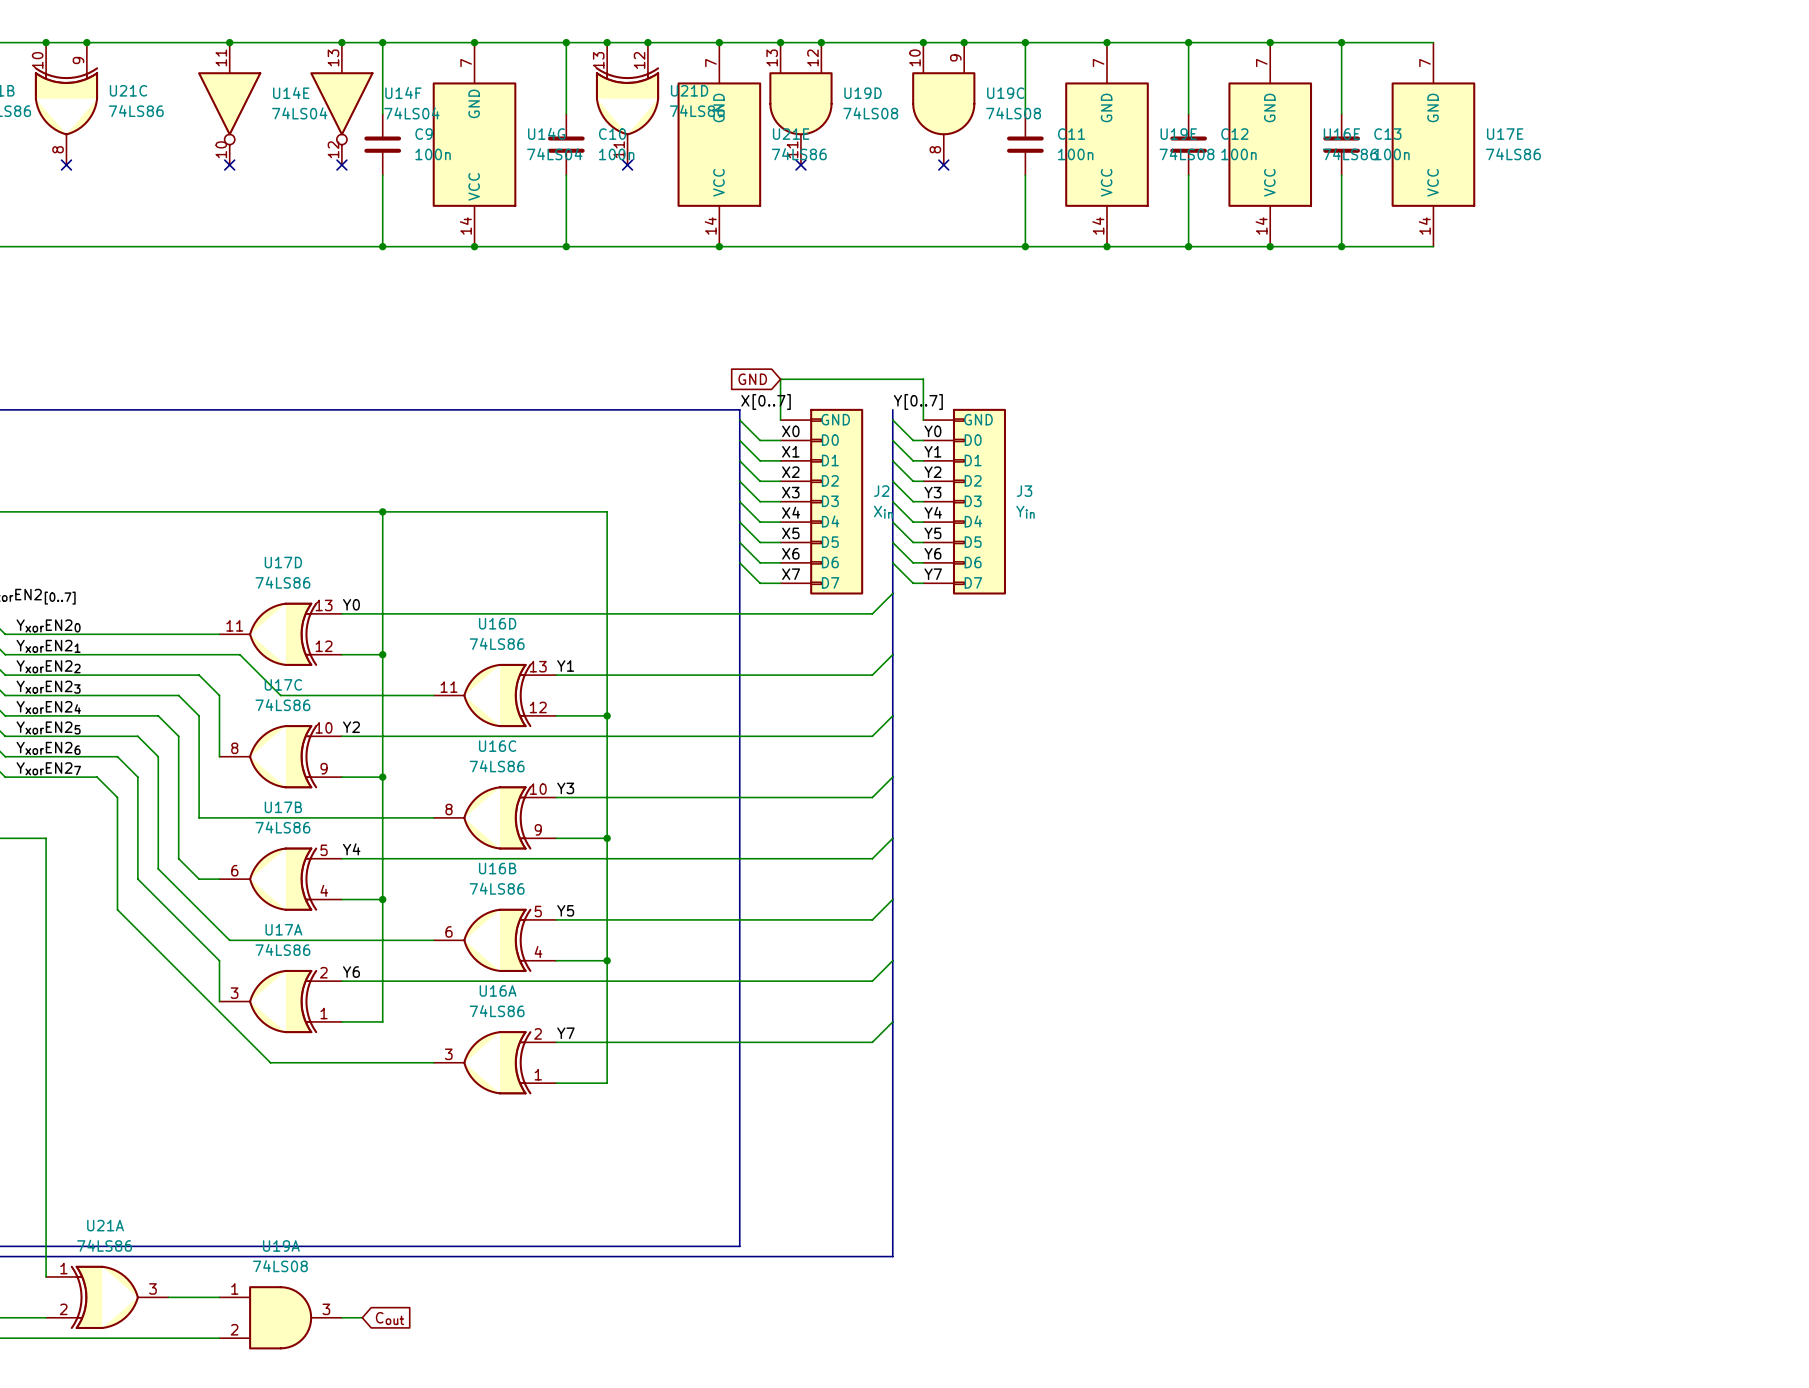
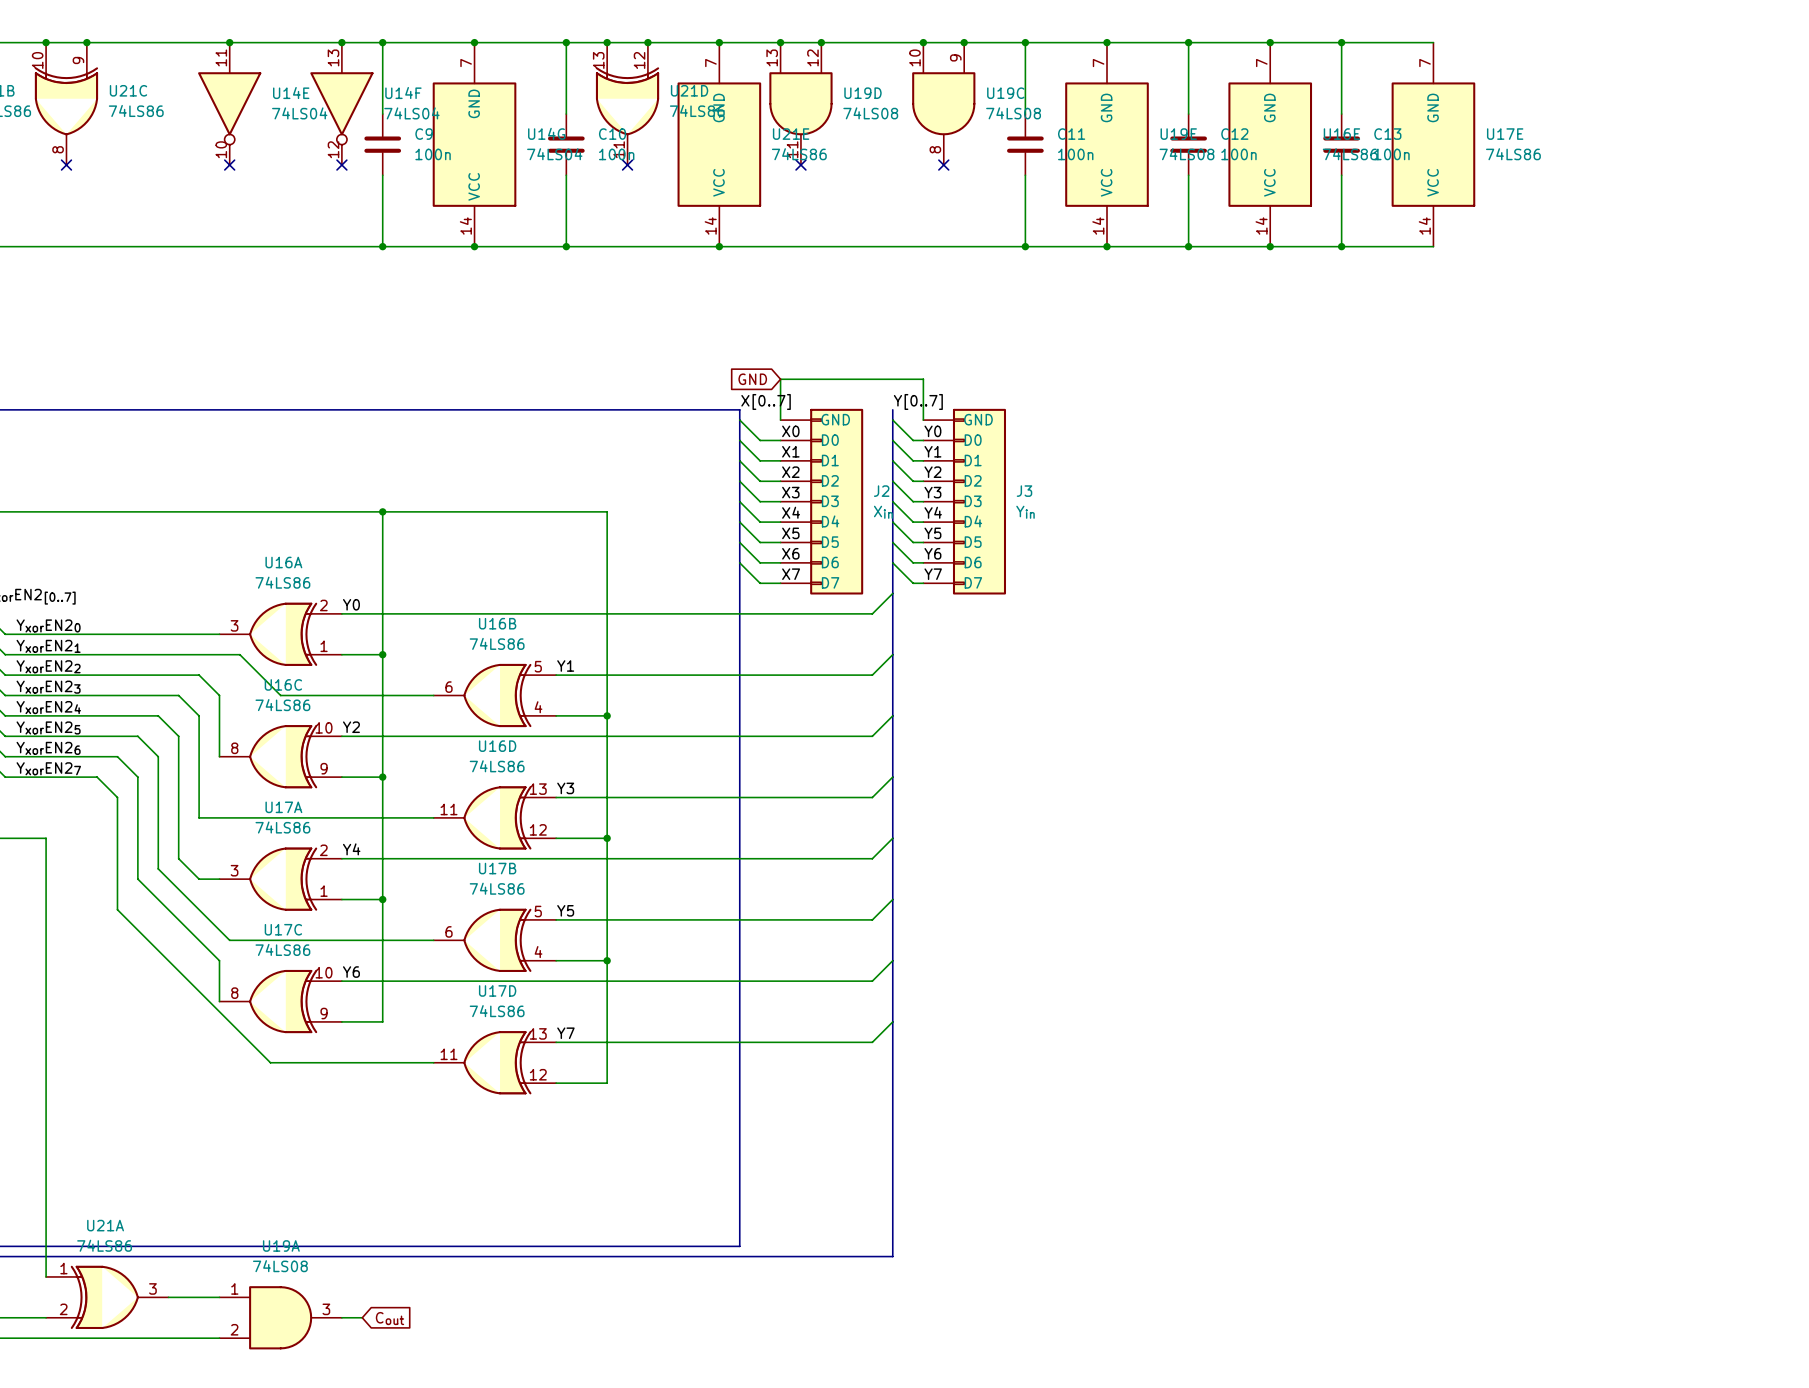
U17D position: (280, 634) -> (494, 1062)
U17C name: U17C (283, 684) -> U16C (283, 684)
U16D position: (494, 695) -> (494, 817)
U16B: none -> 74LS86 (494, 695)
U16C: 74LS86 (494, 817) -> none
U16B name: U16B (497, 868) -> U17B (497, 868)
U17B: 74LS86 (280, 879) -> none
U17A position: (280, 1001) -> (280, 879)
U17C: none -> 74LS86 (280, 1001)
U16A position: (494, 1062) -> (280, 634)

